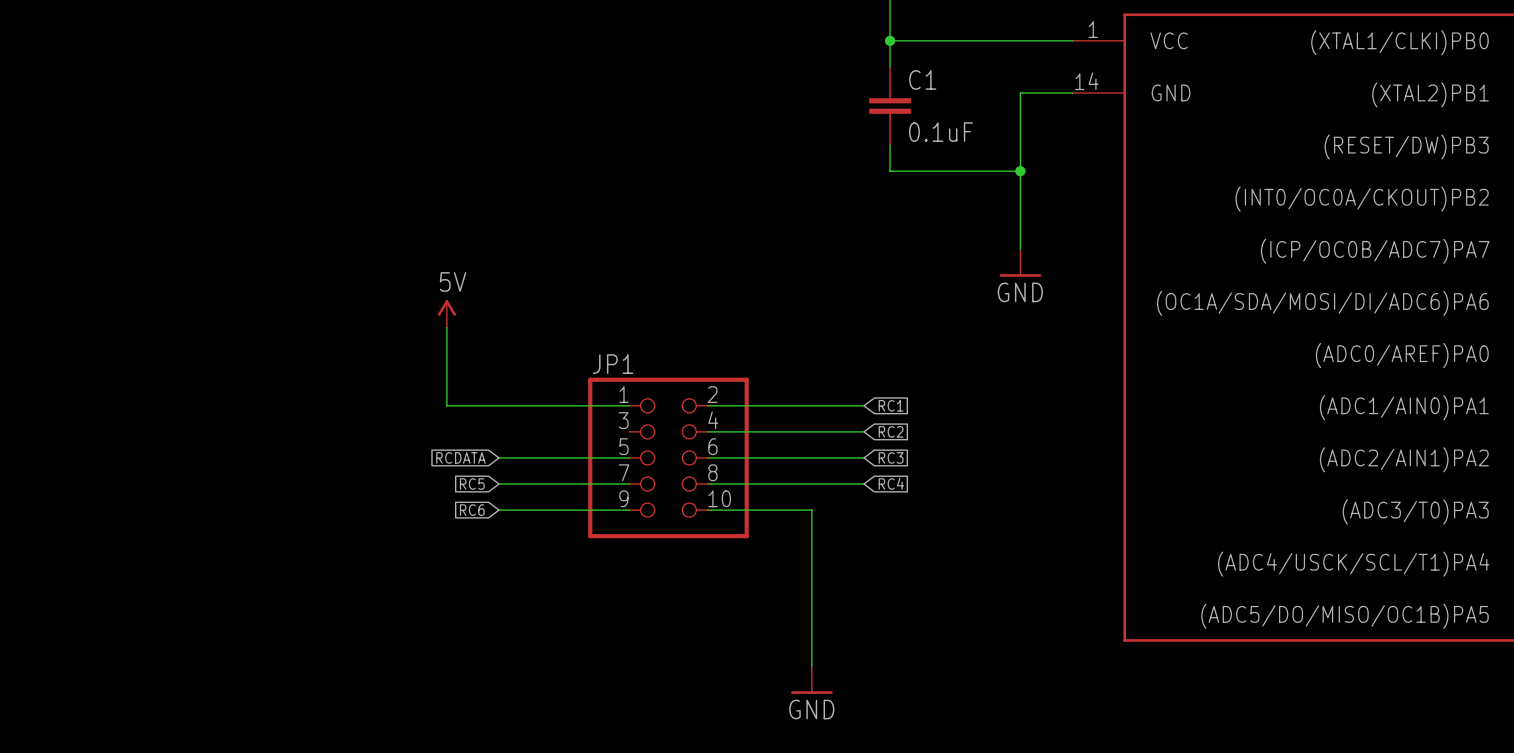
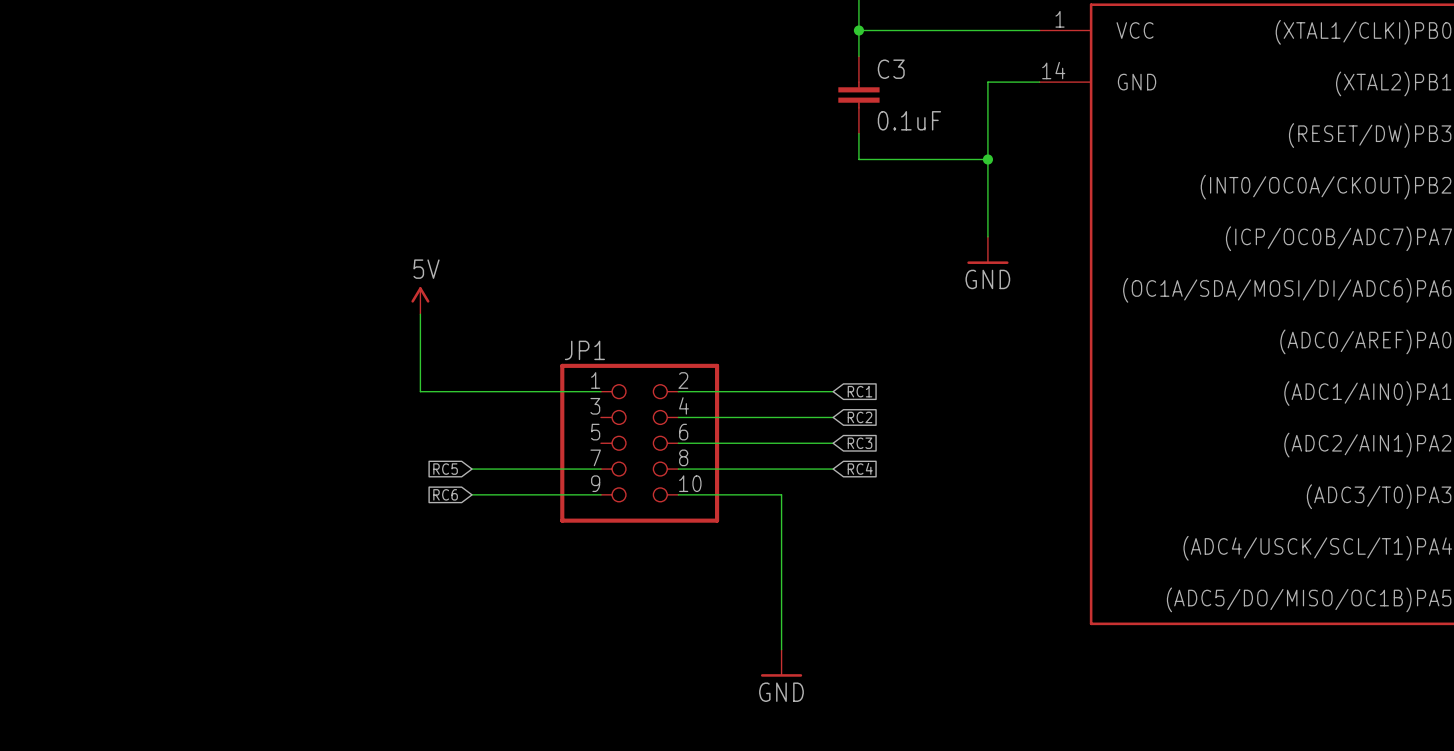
C1 name: C1 (922, 79) -> C3 (891, 69)
global label: RCDATA (460, 457) -> none
wire: (499, 457) (629, 457) -> none

